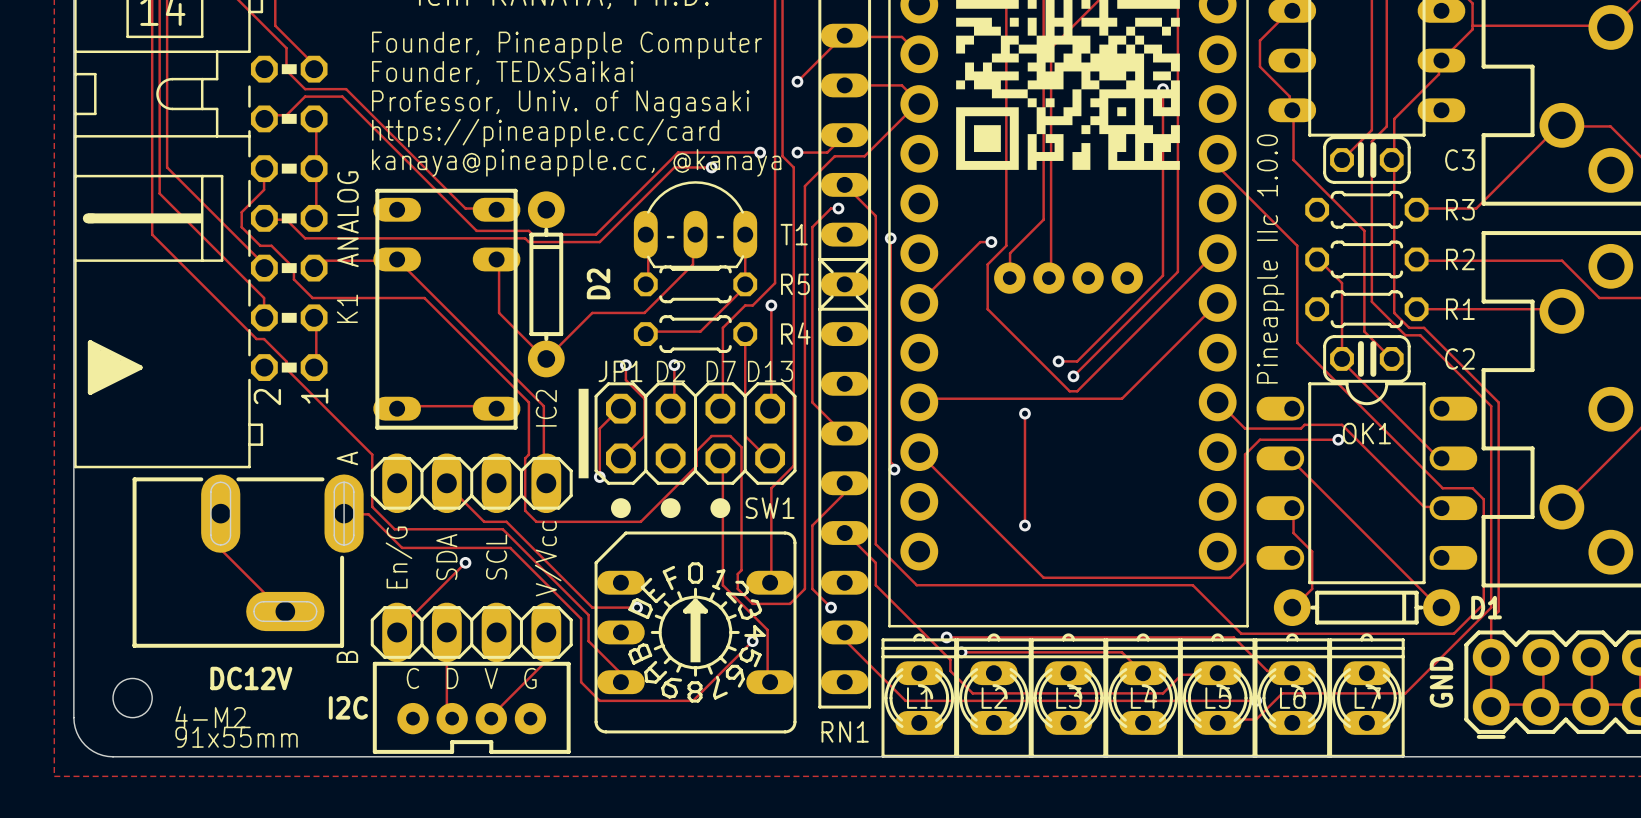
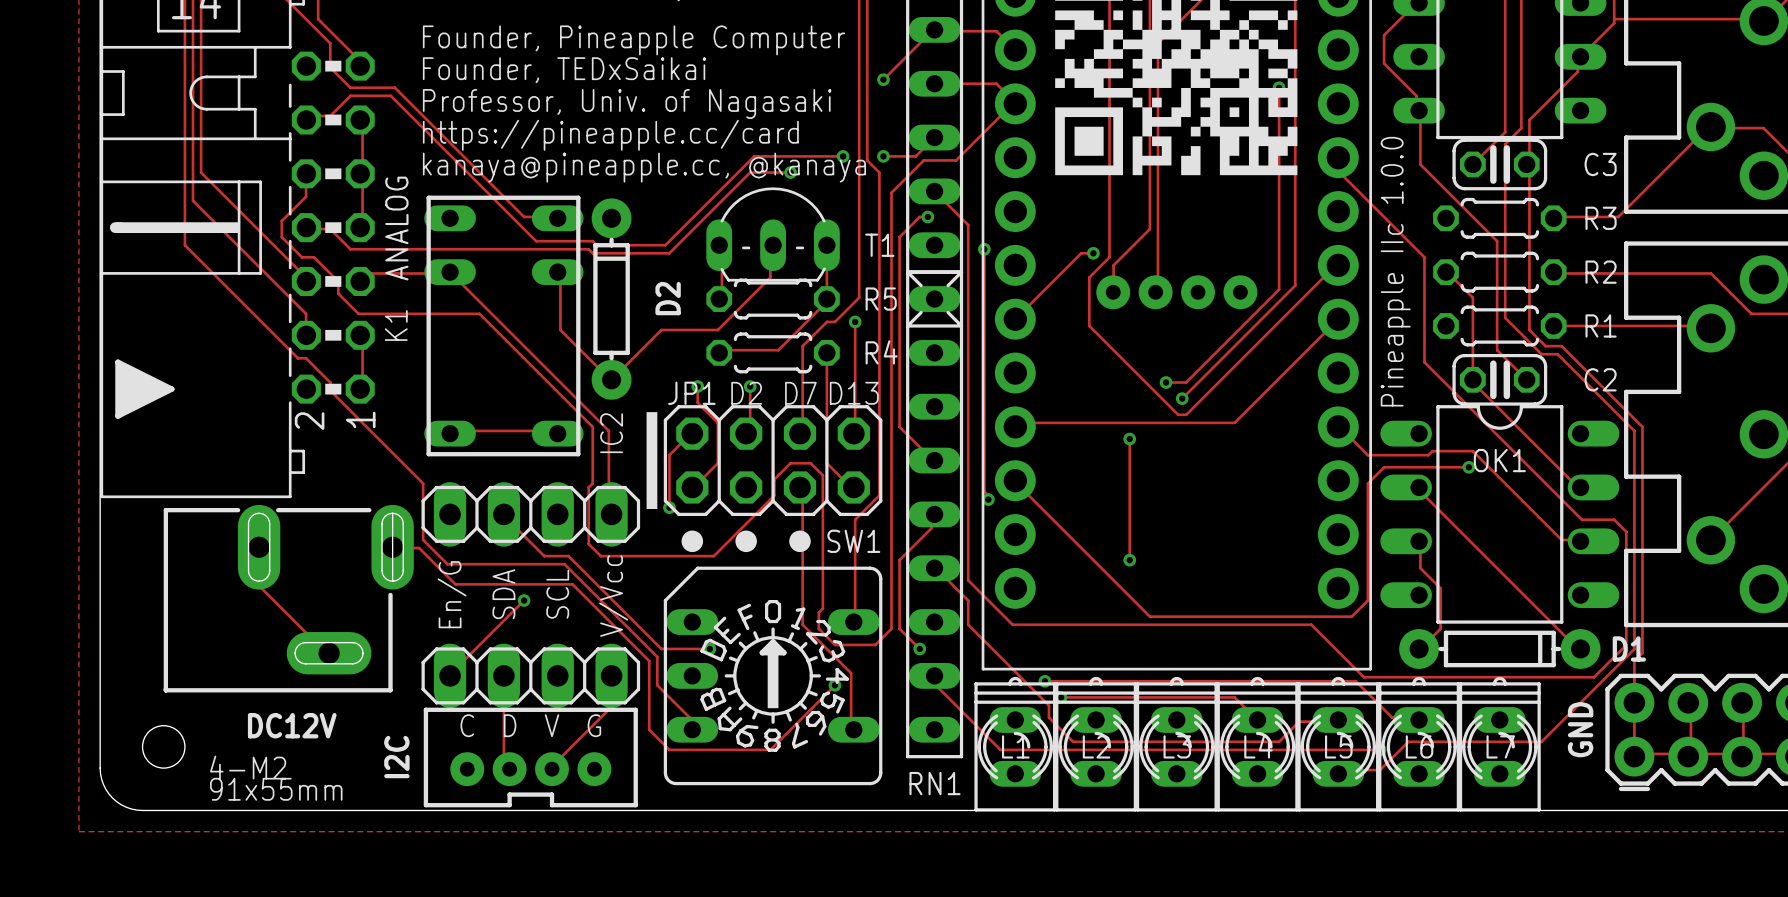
A name: A (347, 458) -> none
B name: B (347, 656) -> none
I2C name rotation: 0° (348, 707) -> 90° counterclockwise (396, 757)

